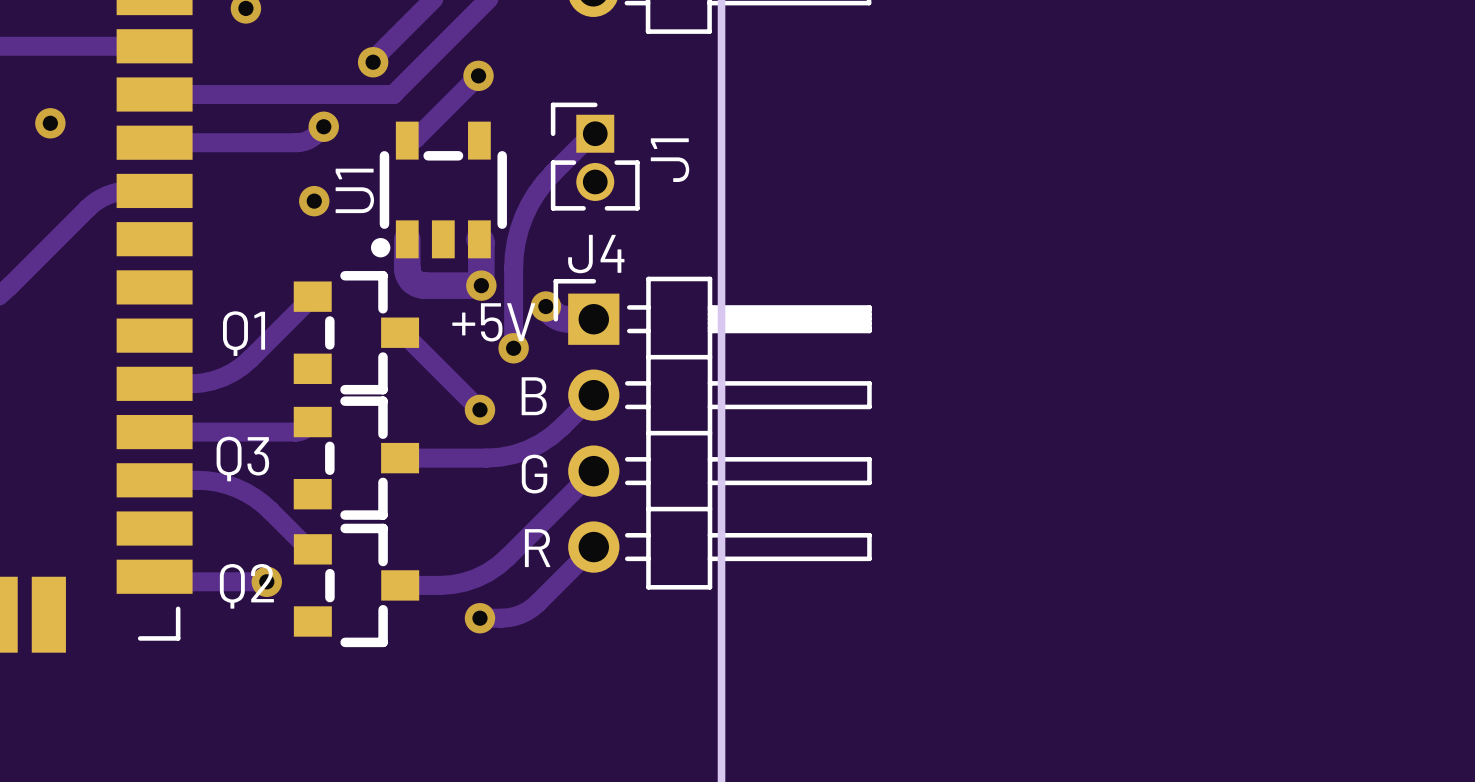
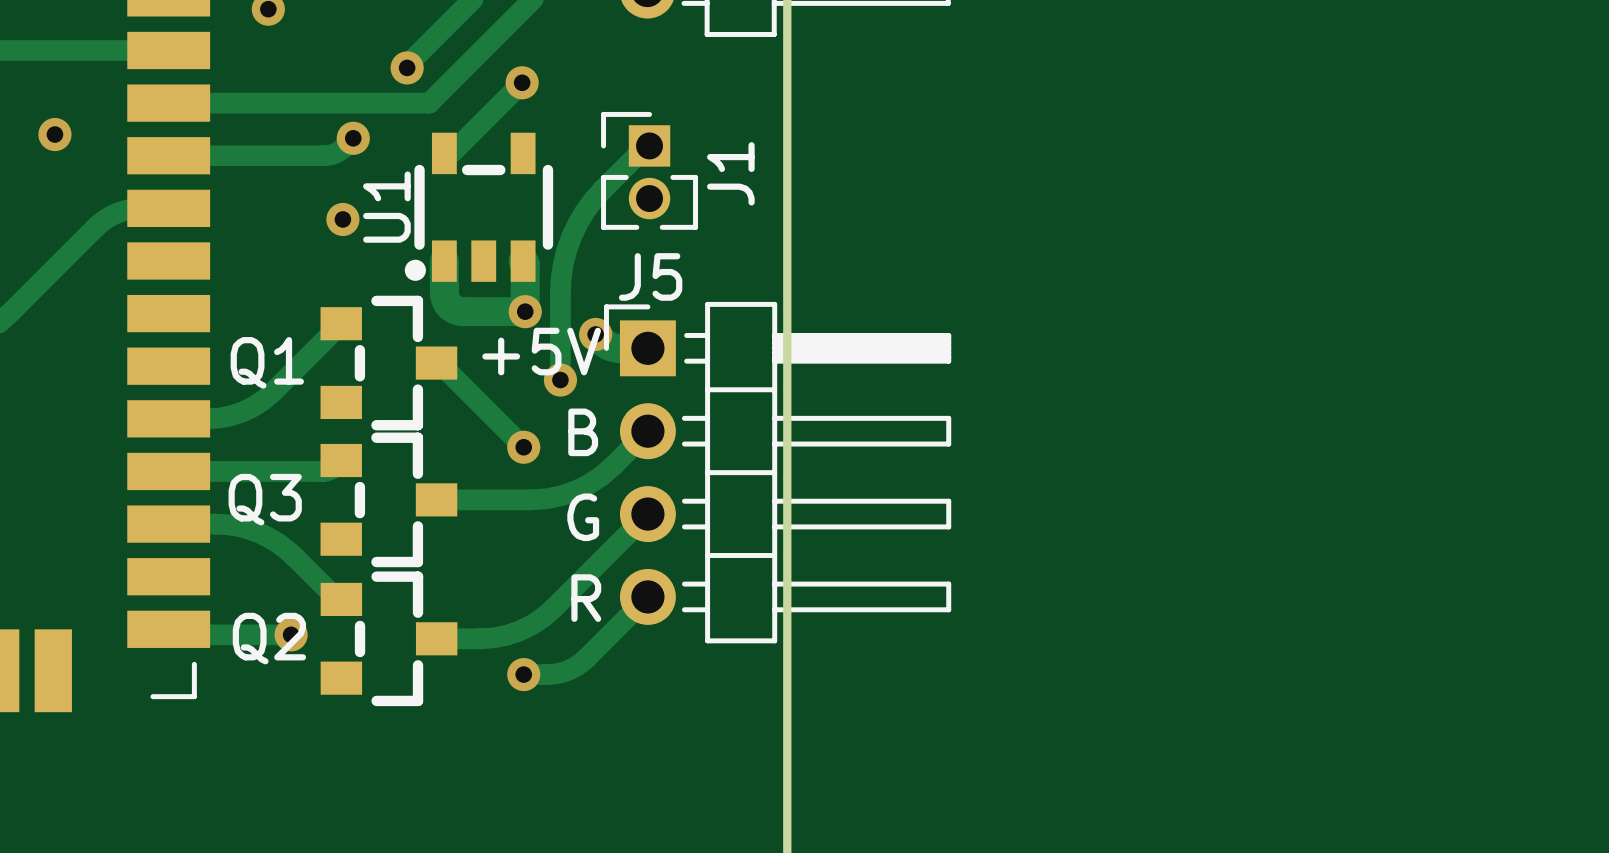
J4 name: J4 (596, 254) -> J5 (650, 276)

